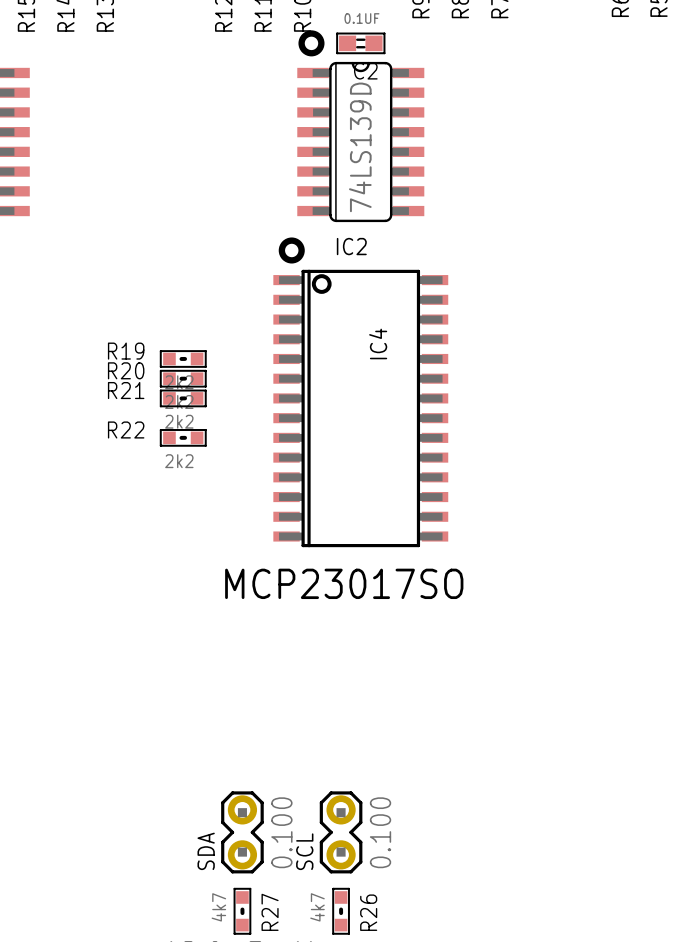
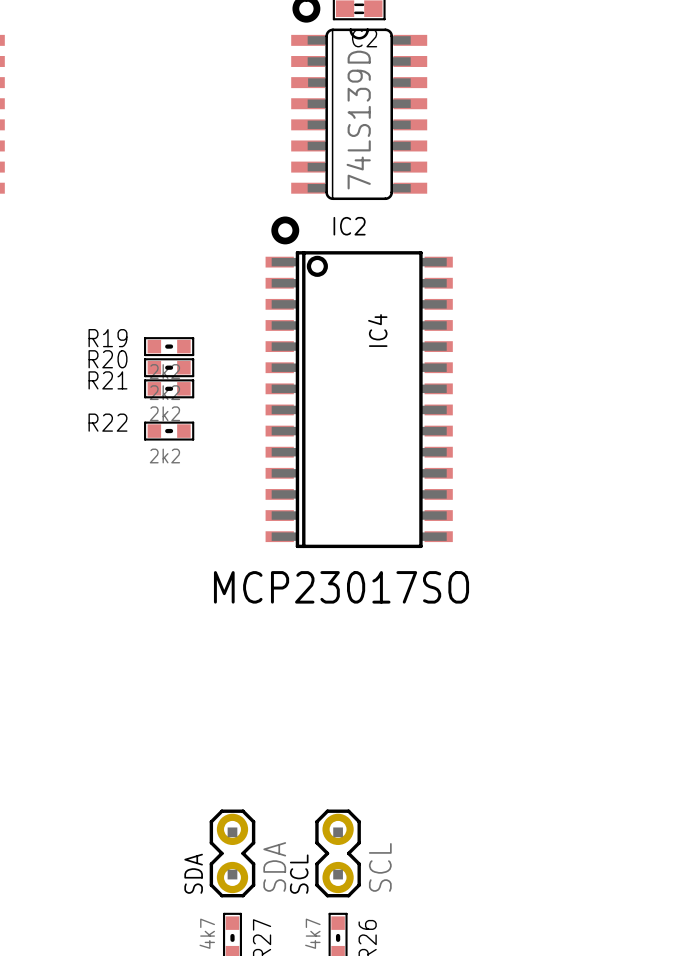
SDA value: 0.100 (281, 832) -> SDA (274, 866)
SCL value: 0.100 (380, 832) -> SCL (380, 867)

